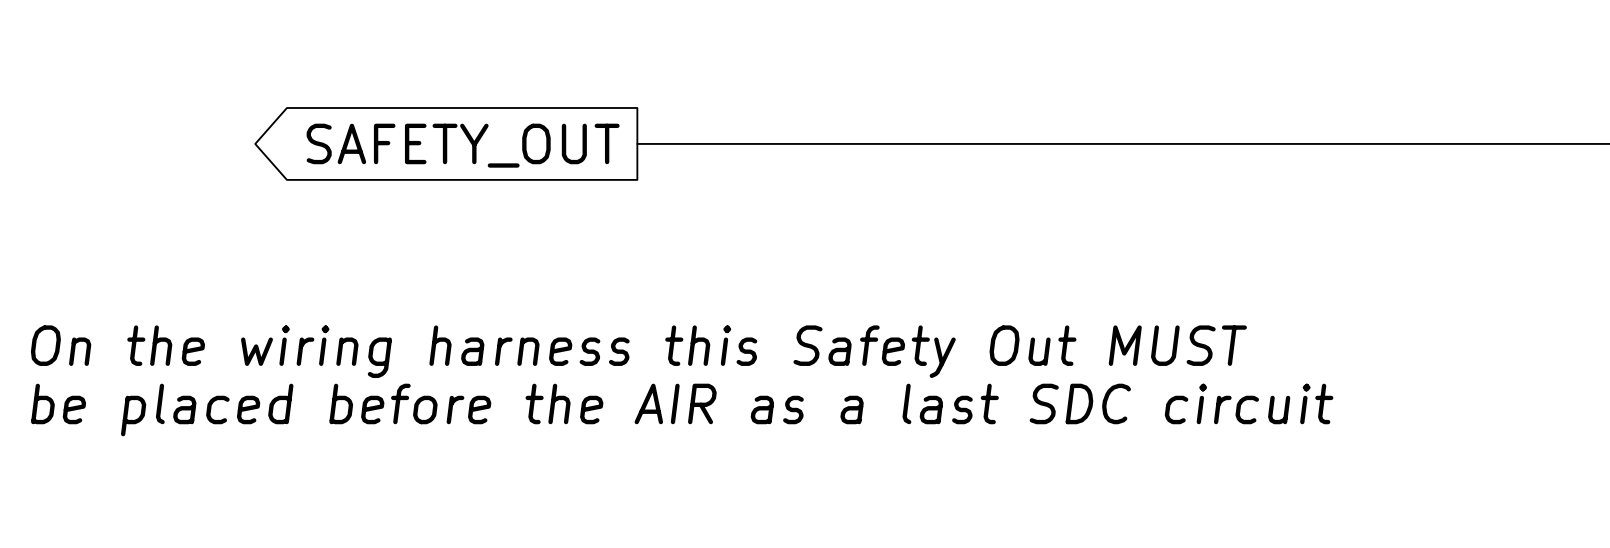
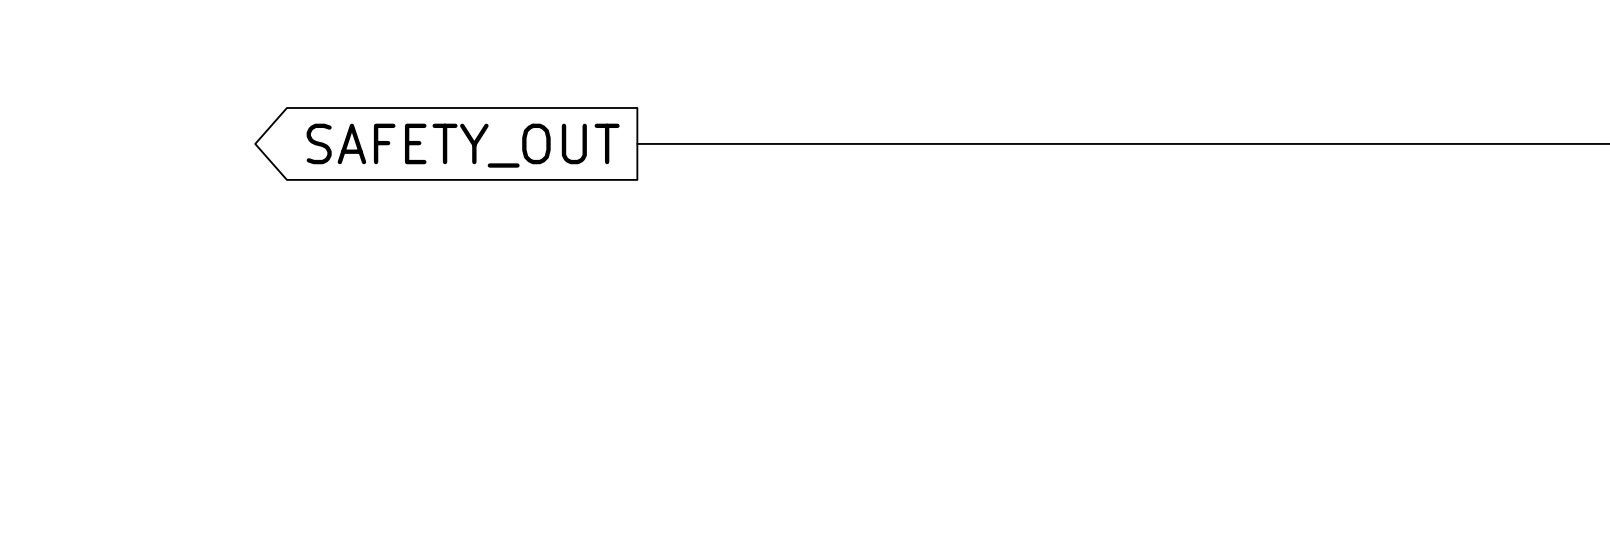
text: On the wiring harness this Safety Out MUST (638, 351) -> none
text: be placed before the AIR as a last SDC circuit (682, 410) -> none

